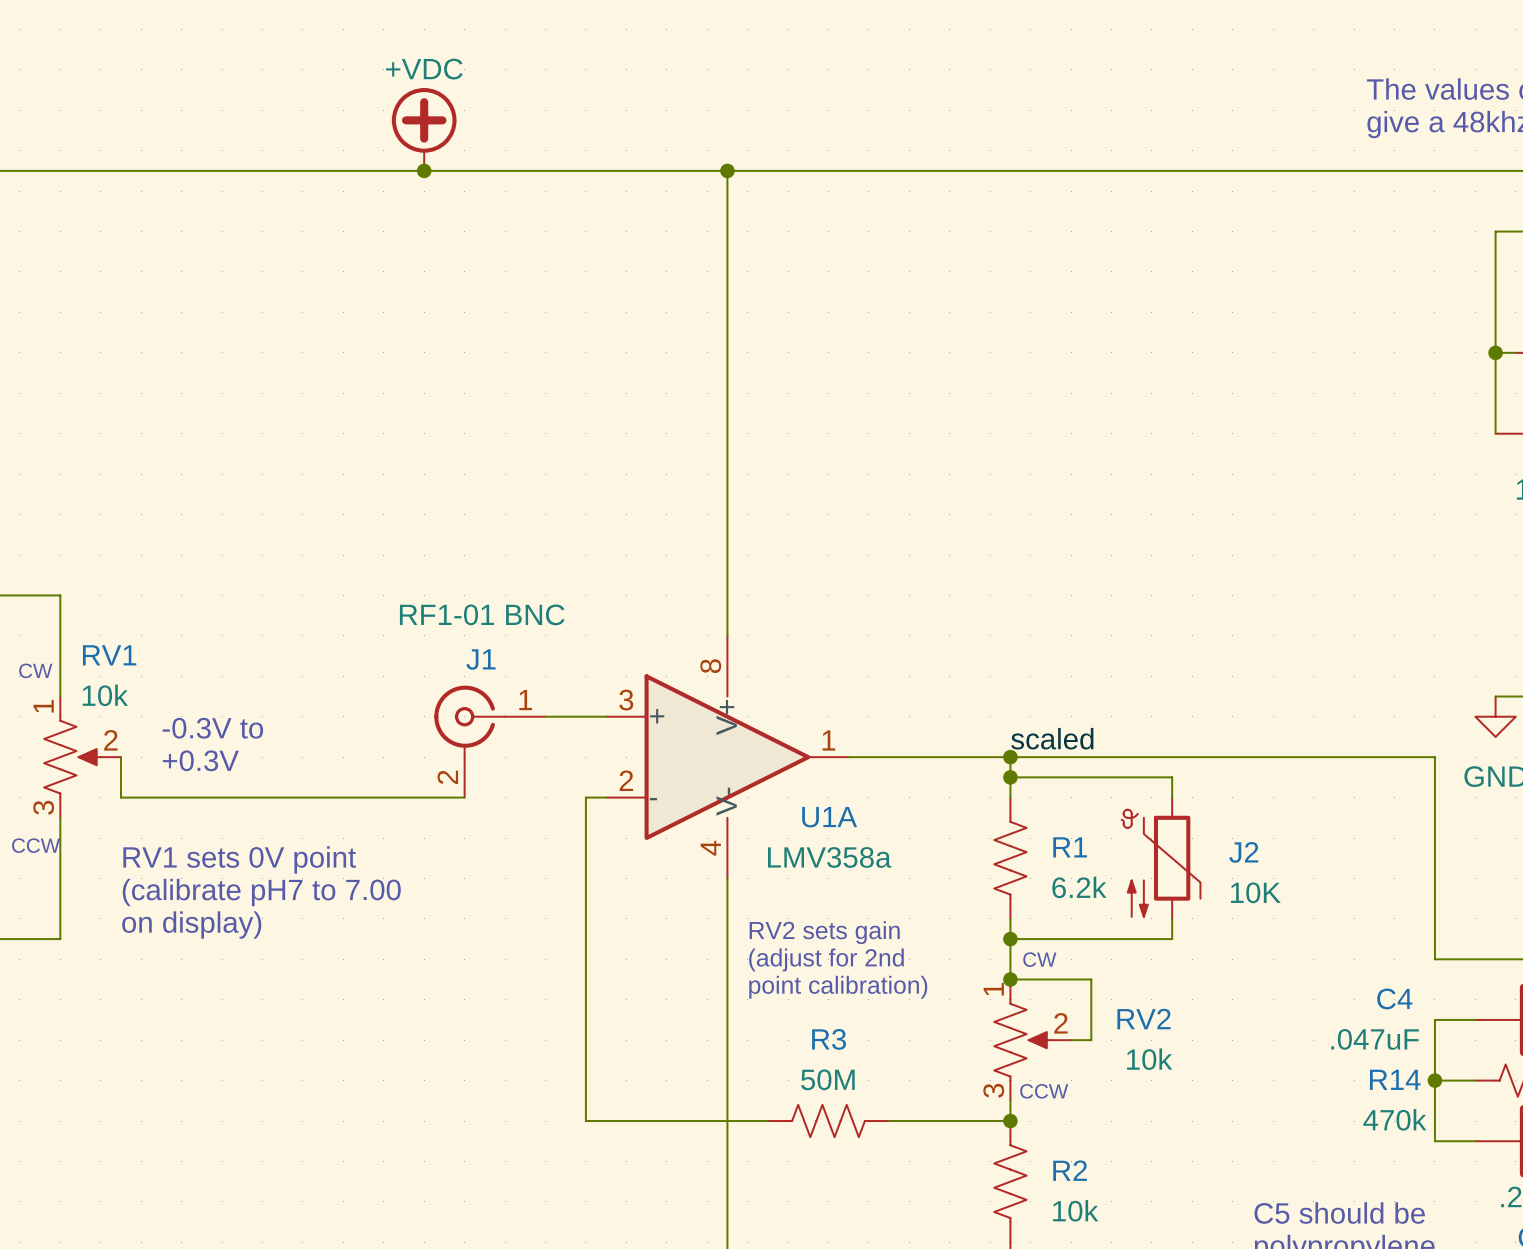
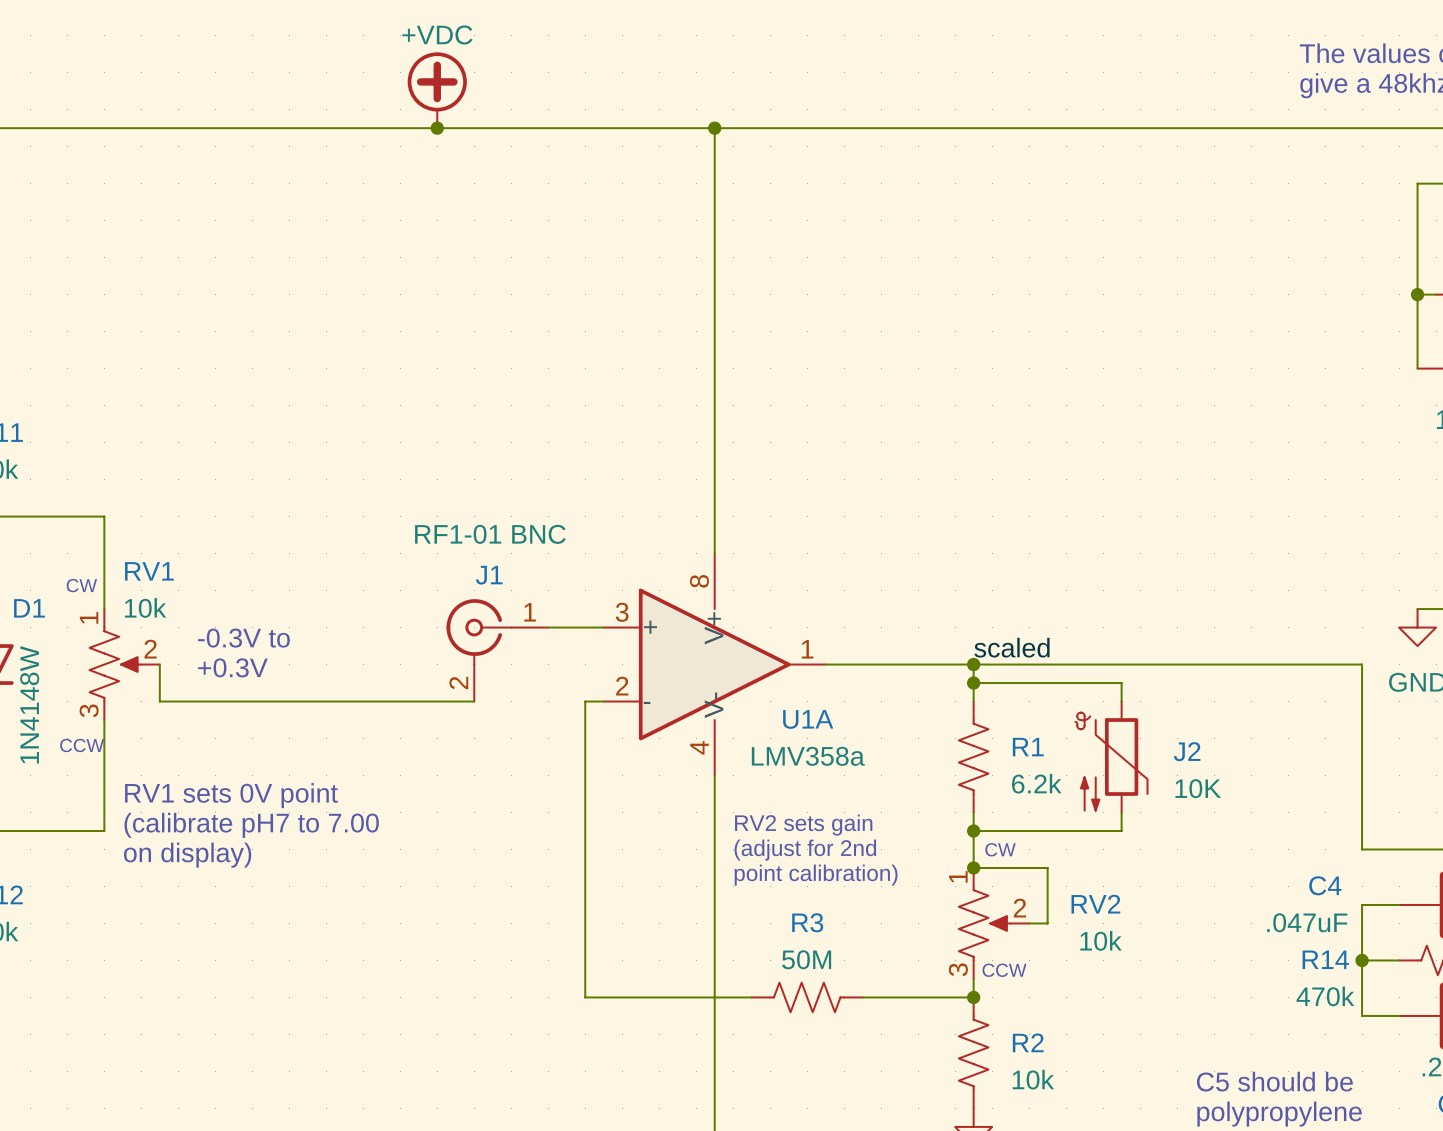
text position: RV1 sets 0V point (239, 859) -> RV1 sets 0V point (231, 795)
text position: (calibrate pH7 to 7.00 (261, 892) -> (calibrate pH7 to 7.00 (251, 825)
text position: on display) (191, 925) -> on display) (187, 855)

